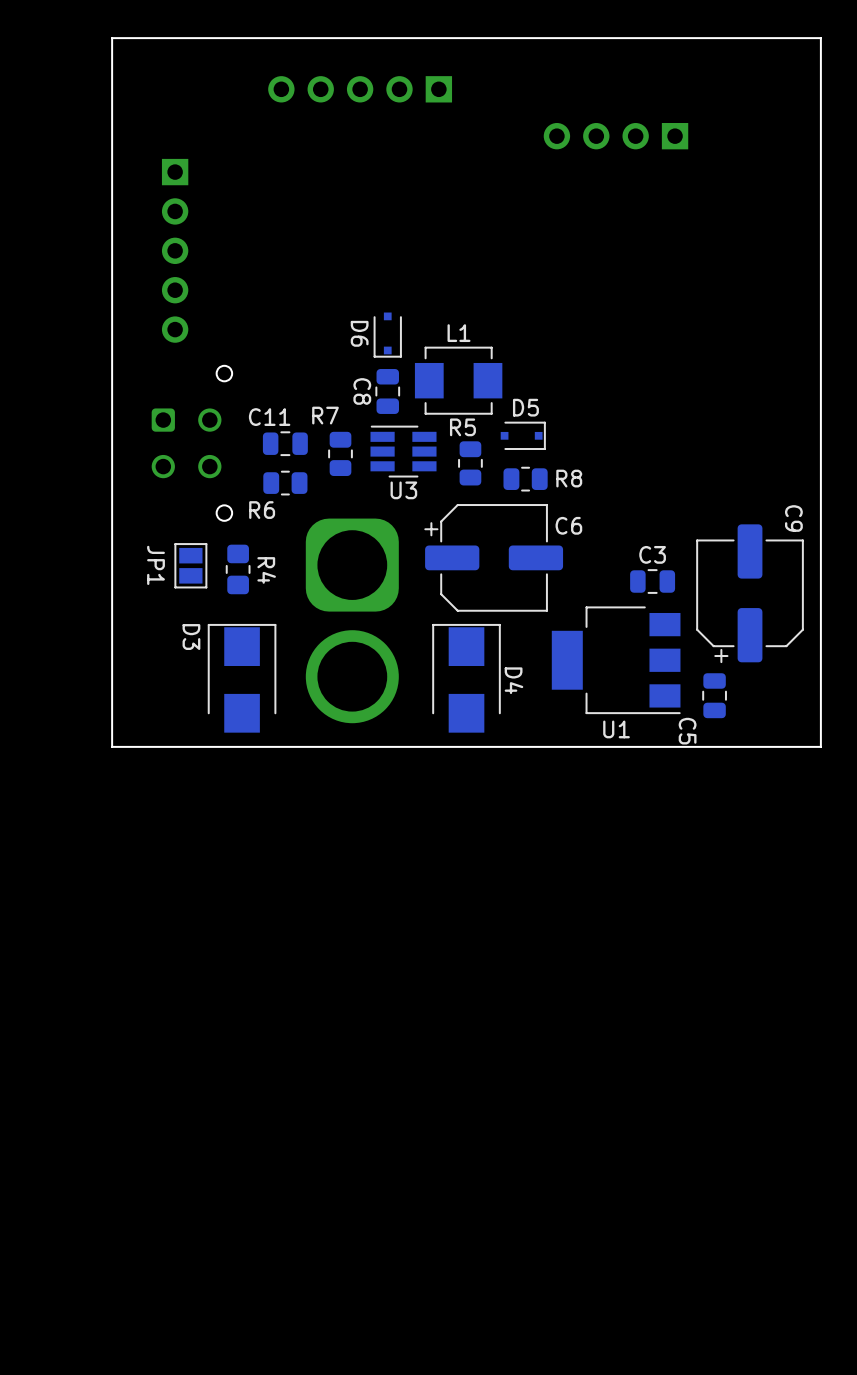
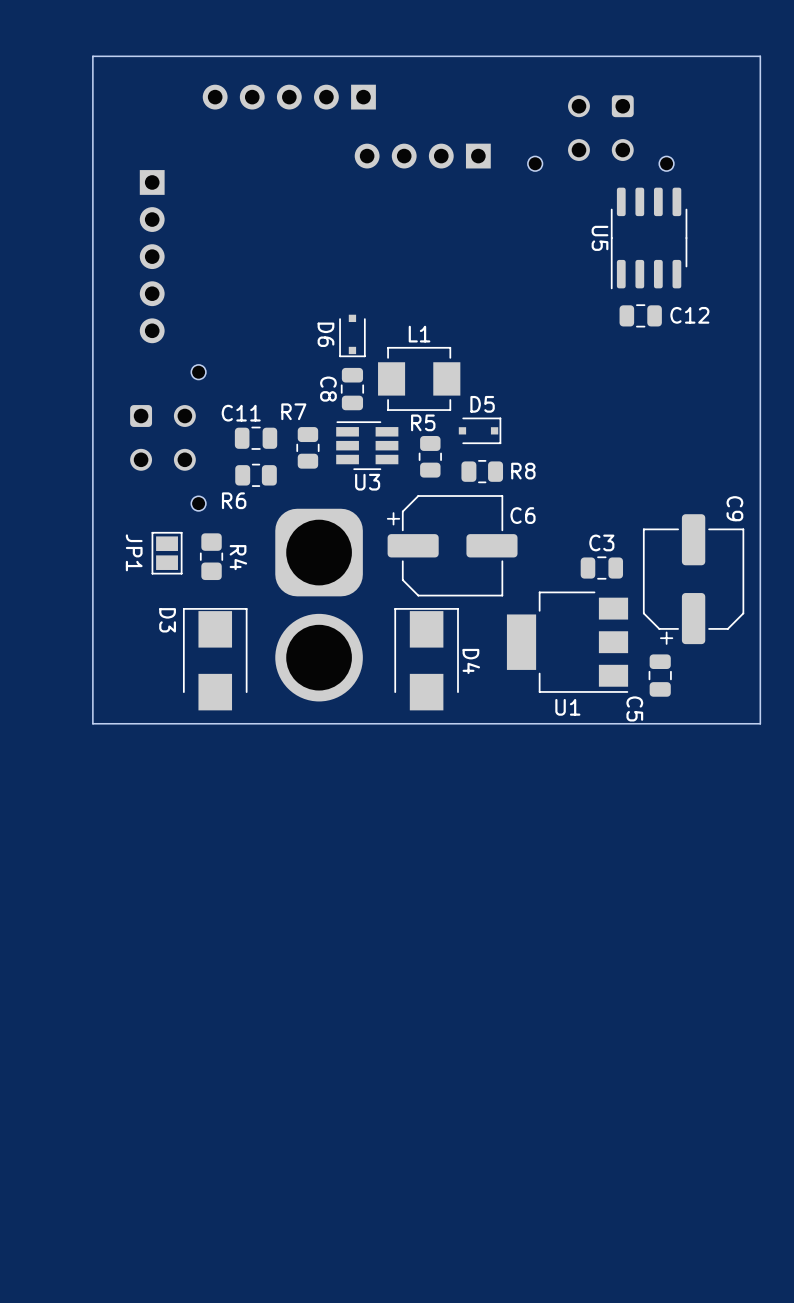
part position: (360, 89) -> (289, 97)
part: none -> (600, 133)
part position: (615, 136) -> (422, 156)
U5: none -> (649, 238)
C12: none -> (640, 315)

